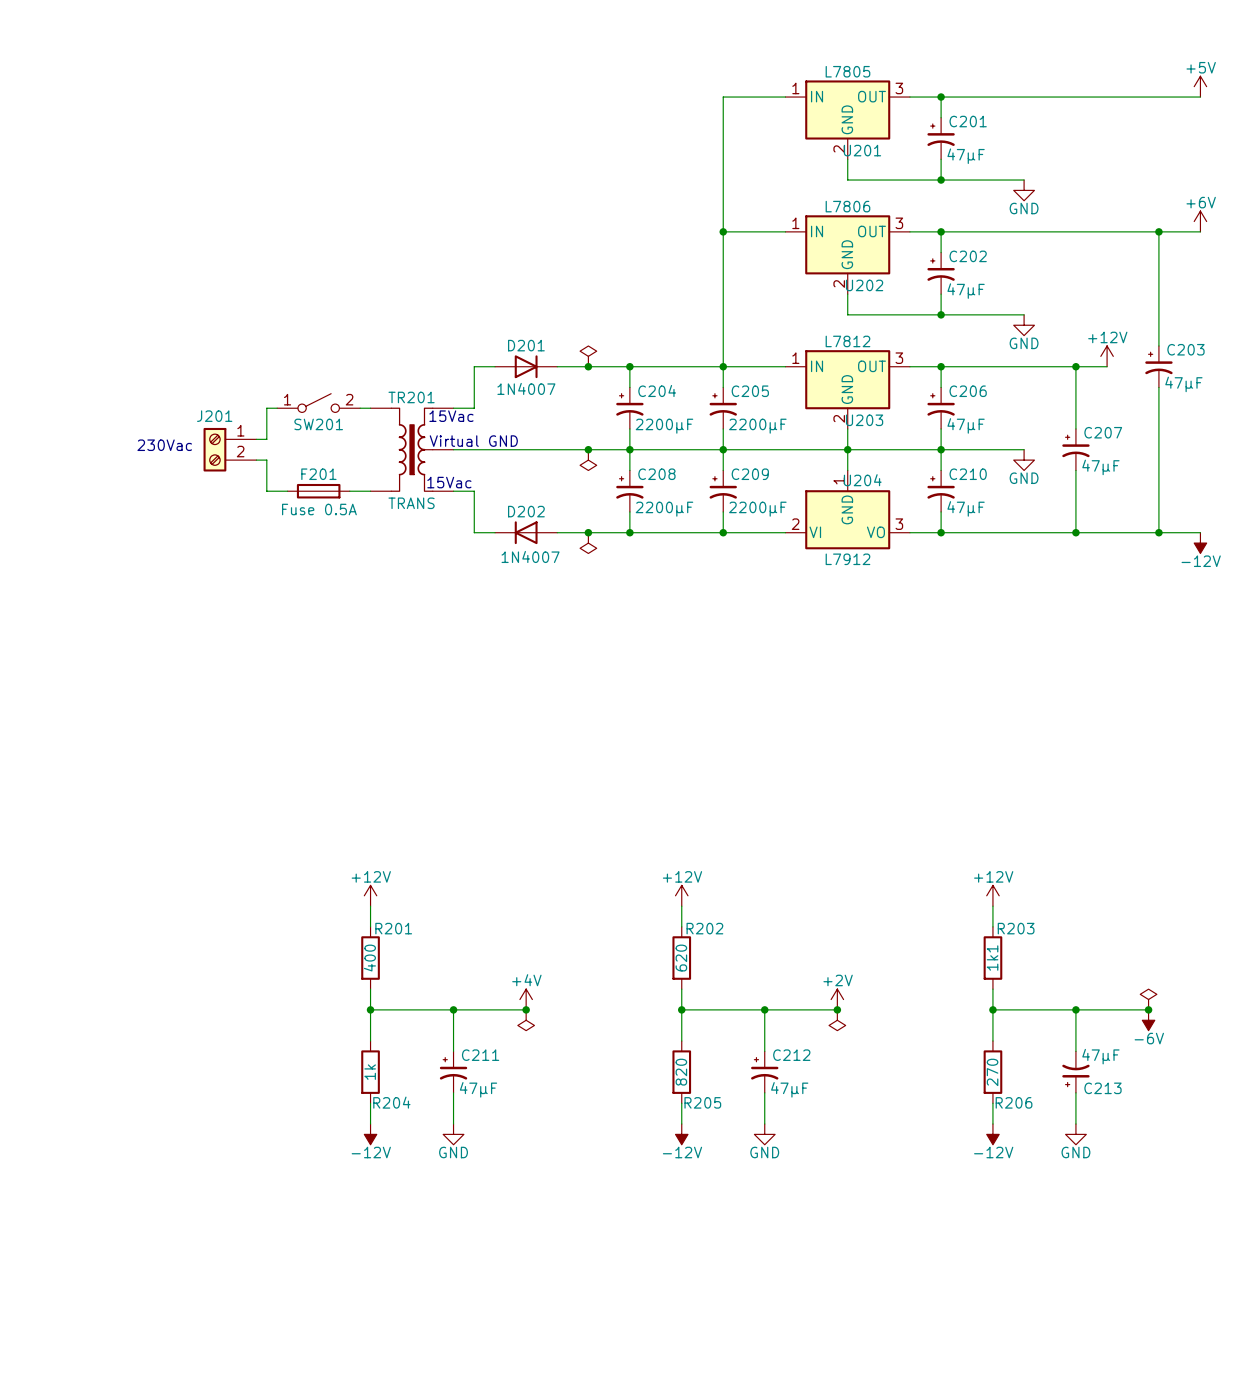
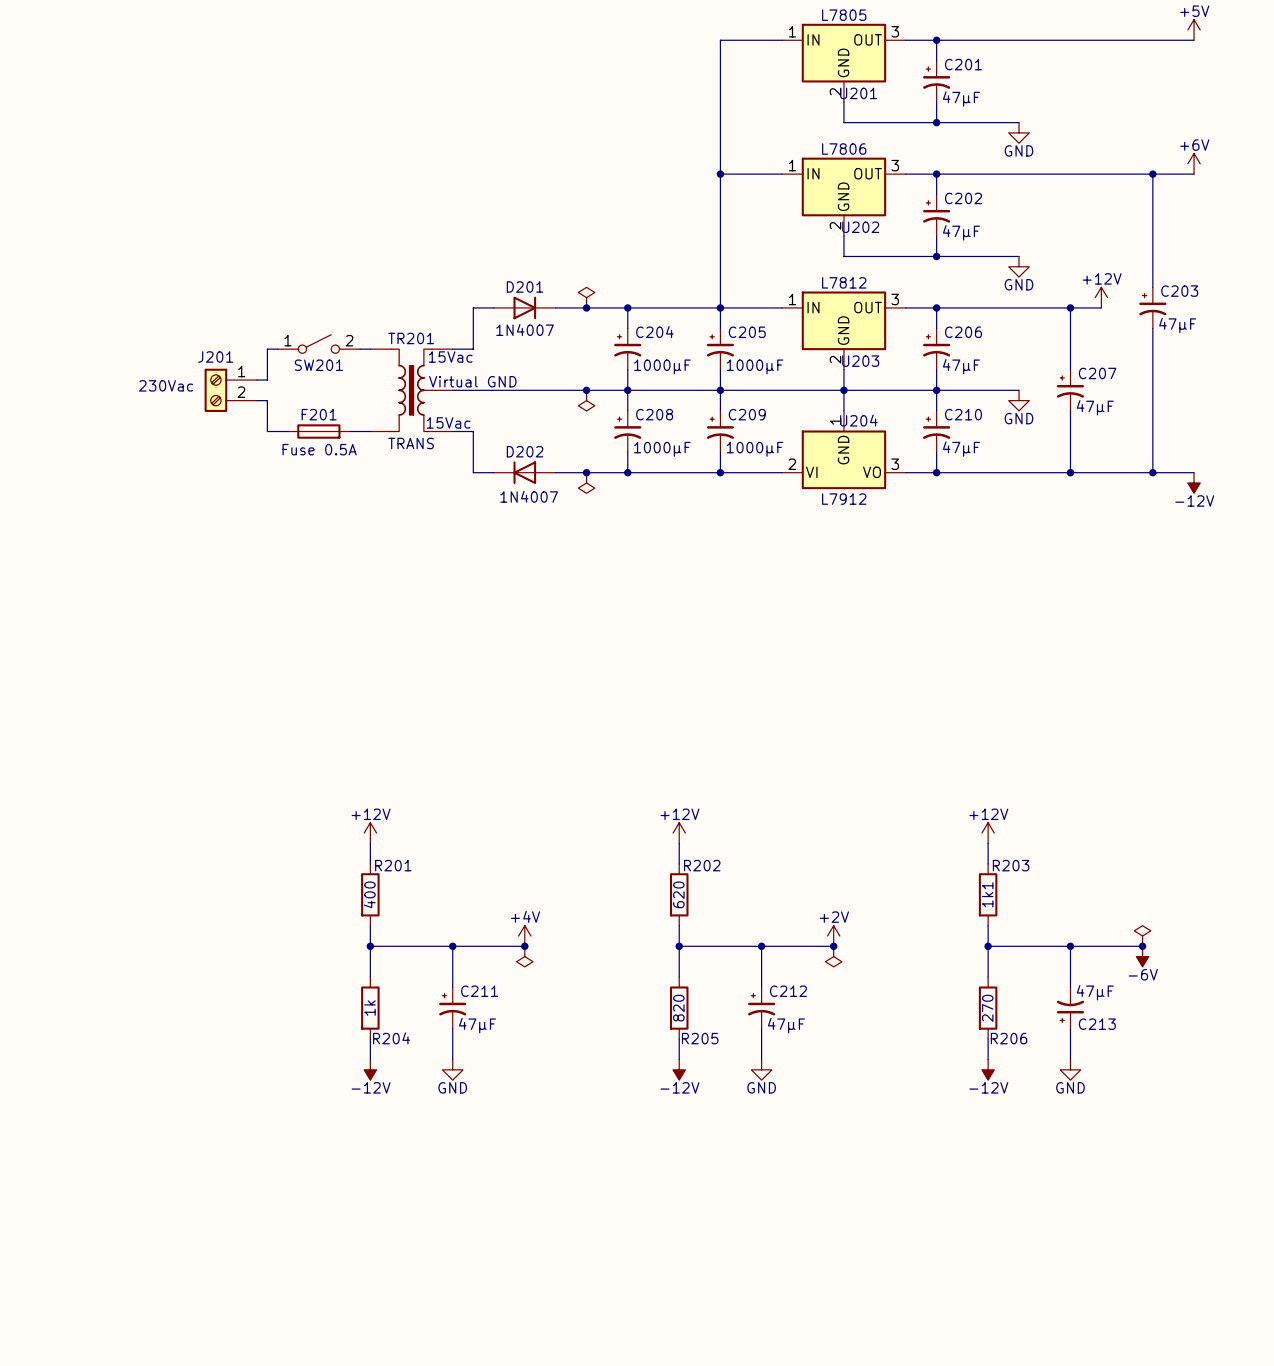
C204 value: 2200µF (664, 426) -> 1000µF (662, 366)
C205 value: 2200µF (757, 426) -> 1000µF (755, 366)
C208 value: 2200µF (664, 509) -> 1000µF (662, 449)
C209 value: 2200µF (757, 509) -> 1000µF (755, 449)

